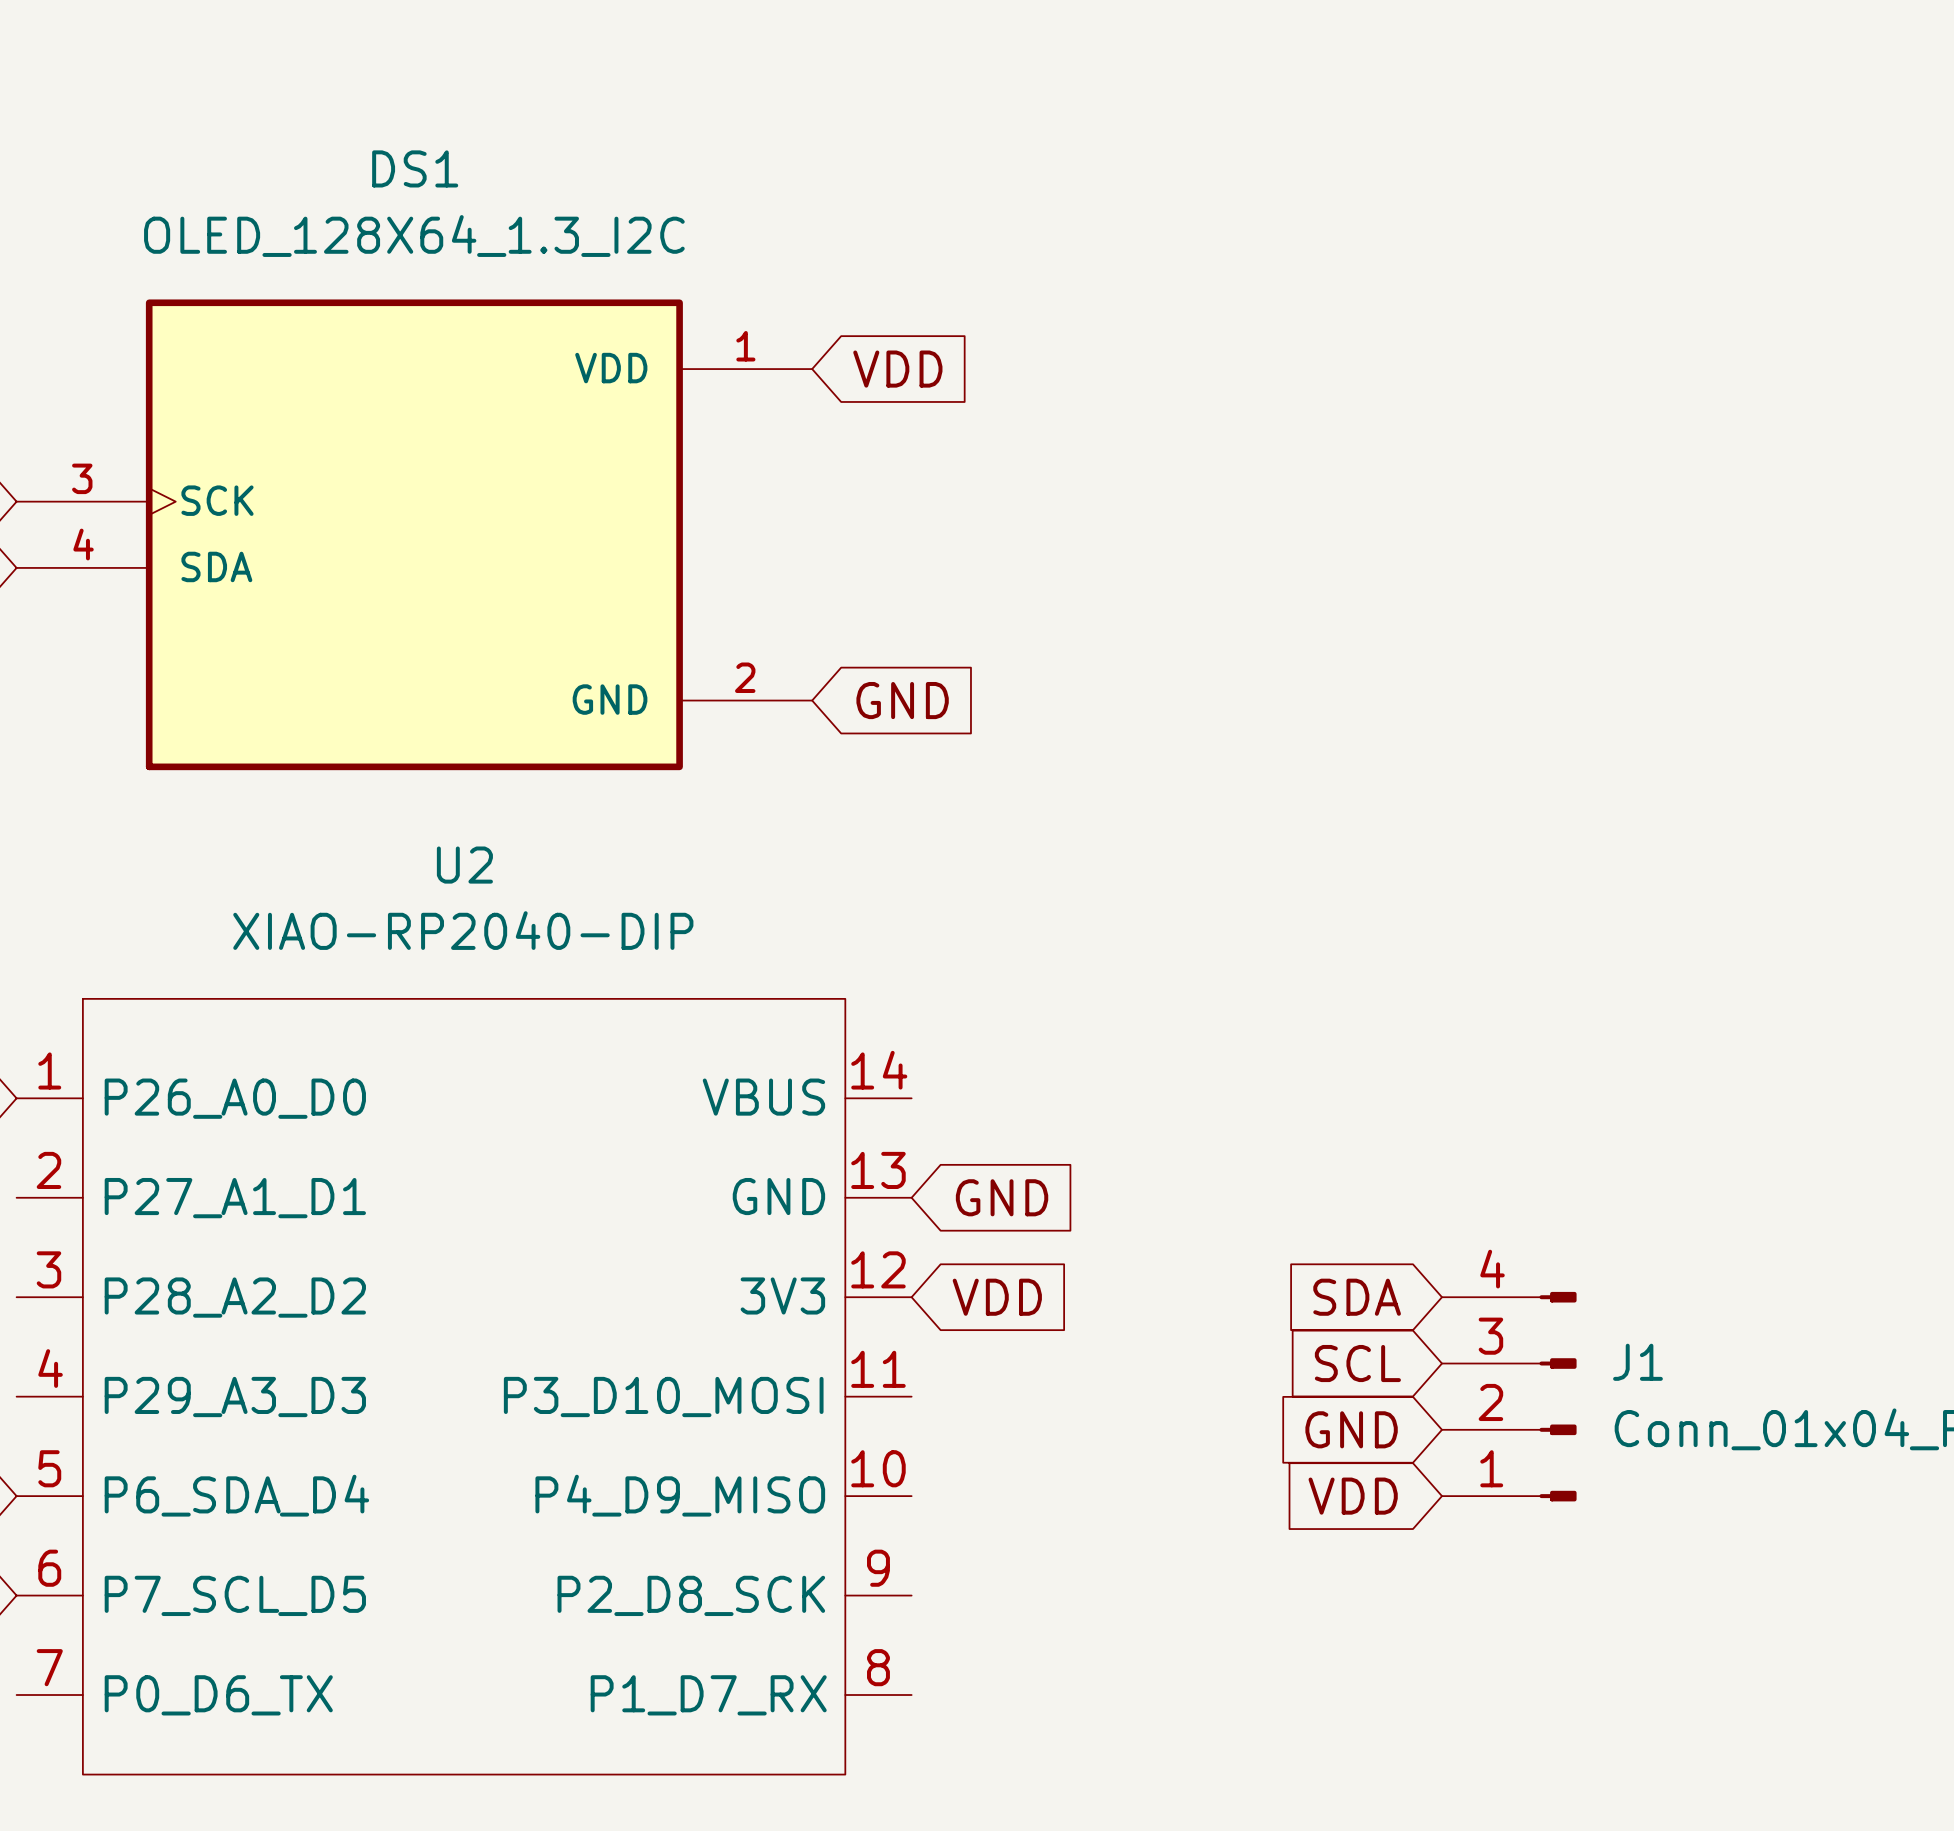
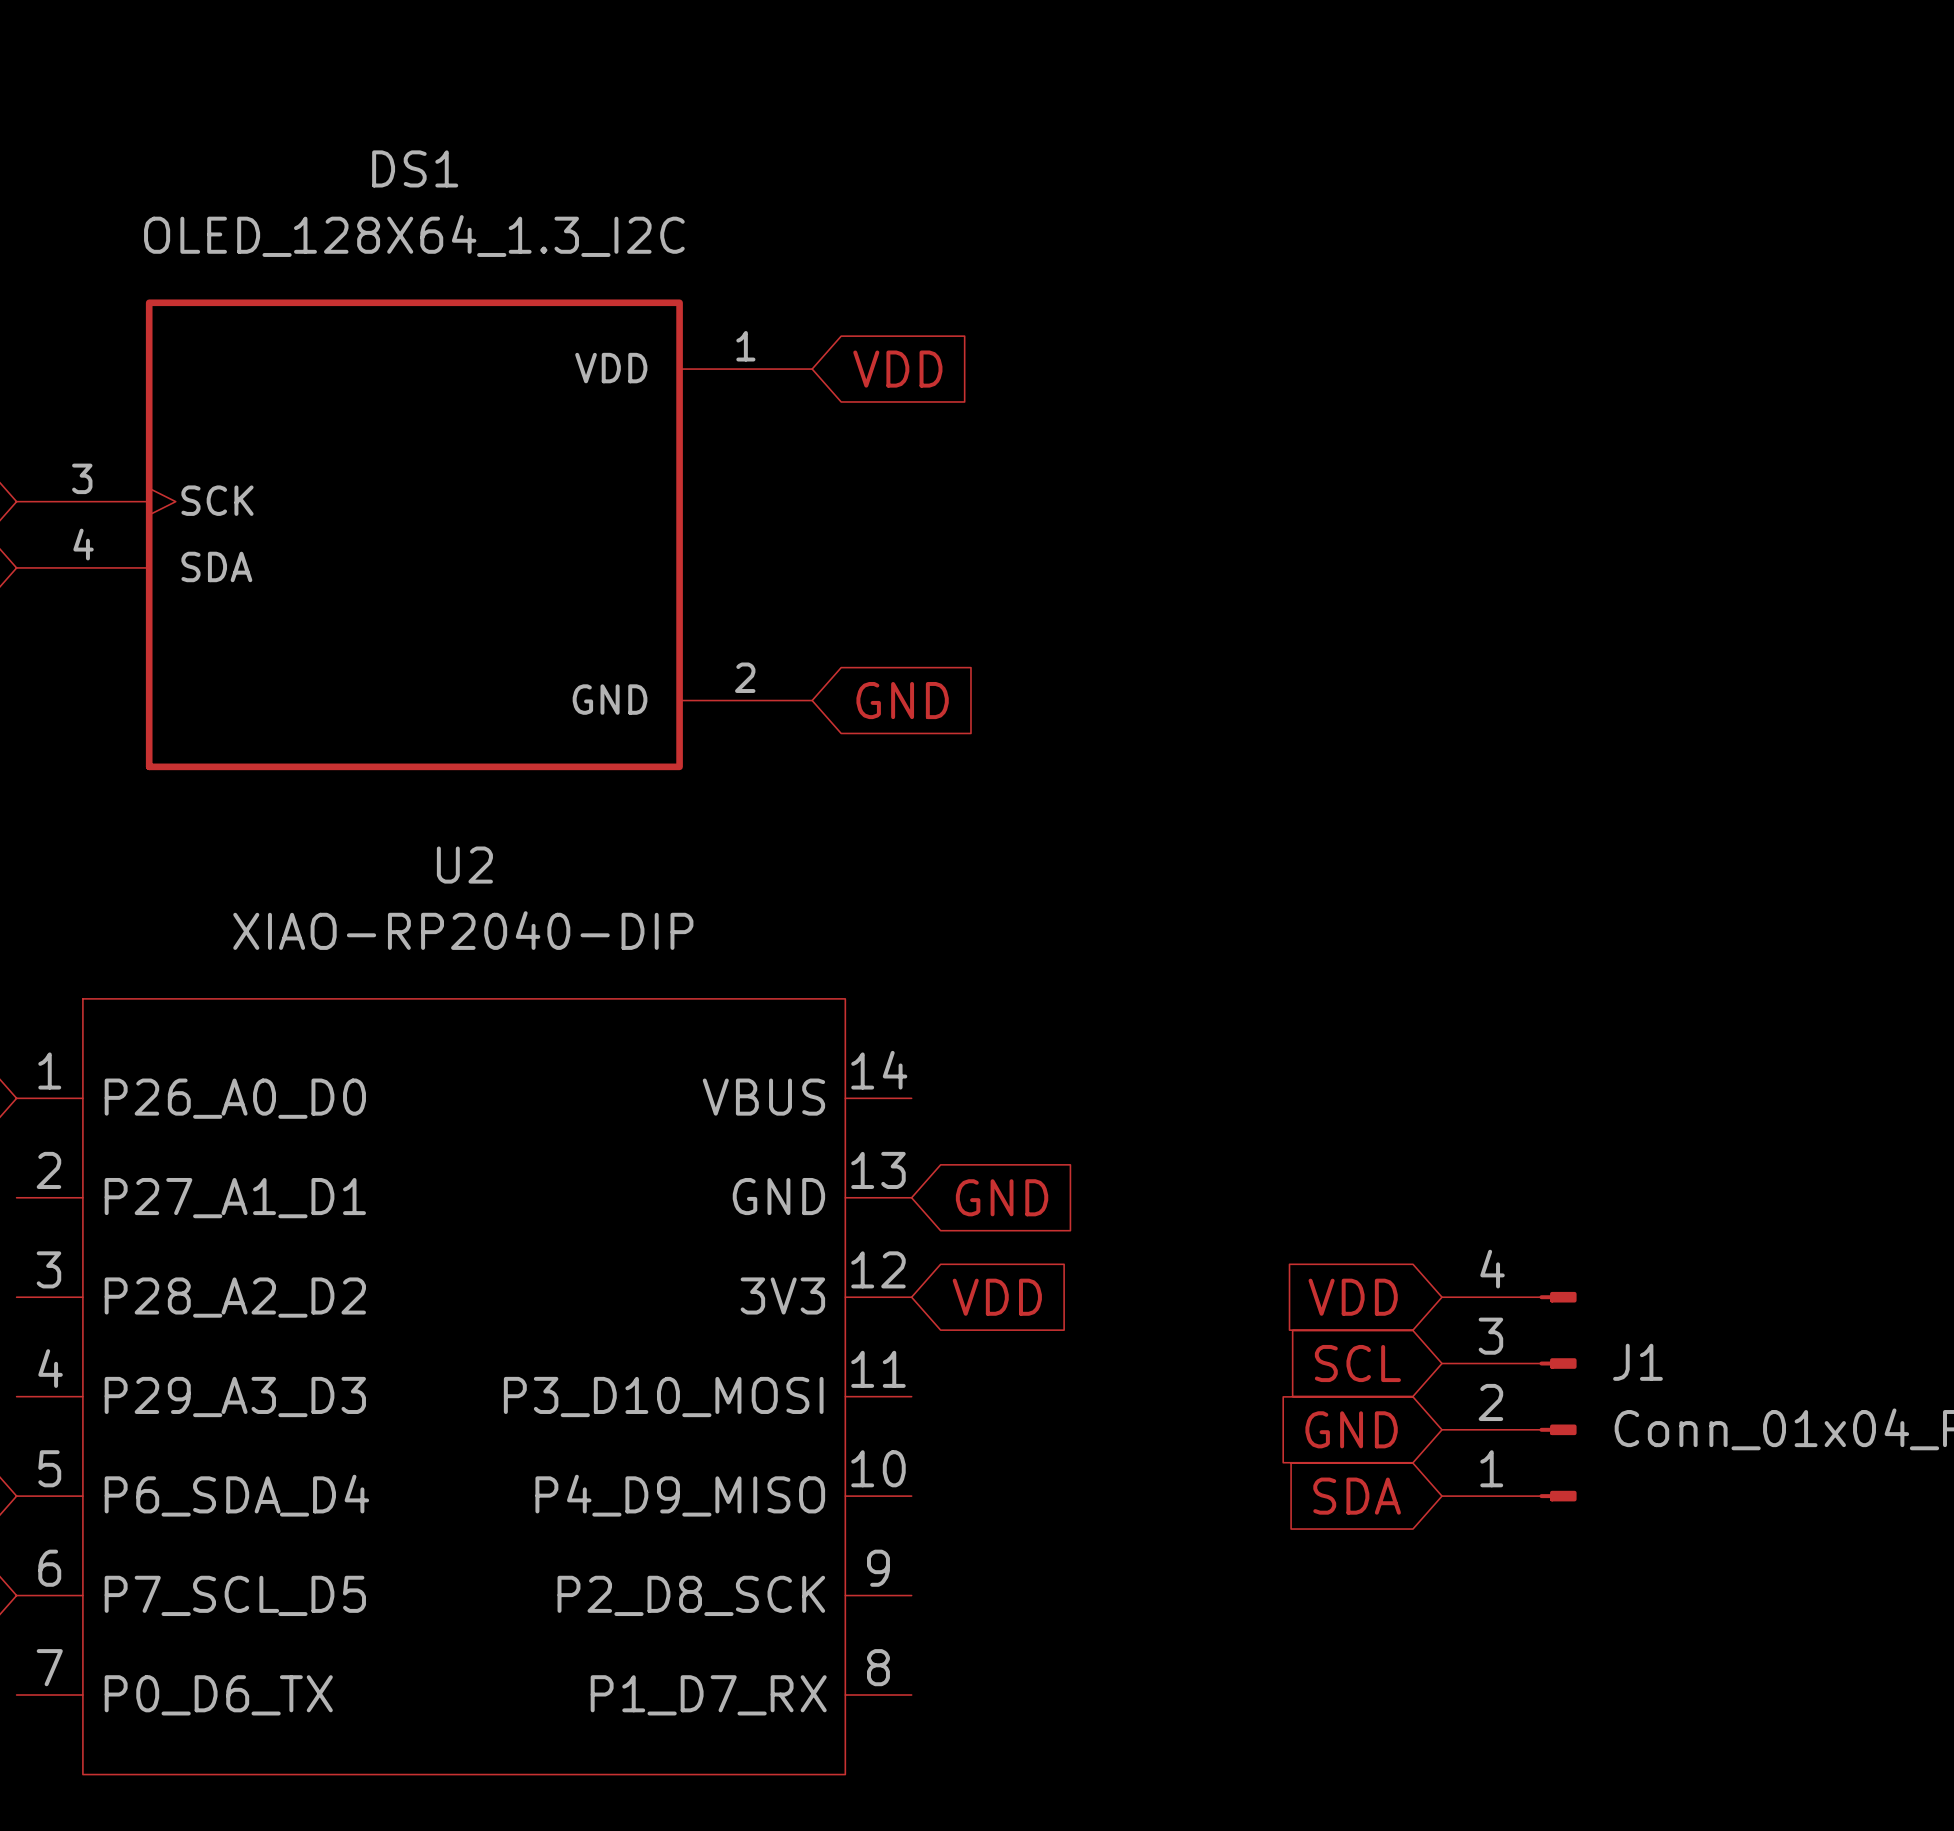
global label: SDA (1357, 1297) -> VDD (1353, 1297)
global label: VDD (1353, 1496) -> SDA (1357, 1496)

